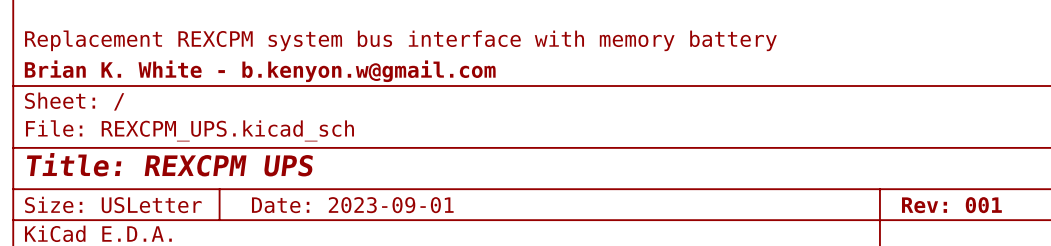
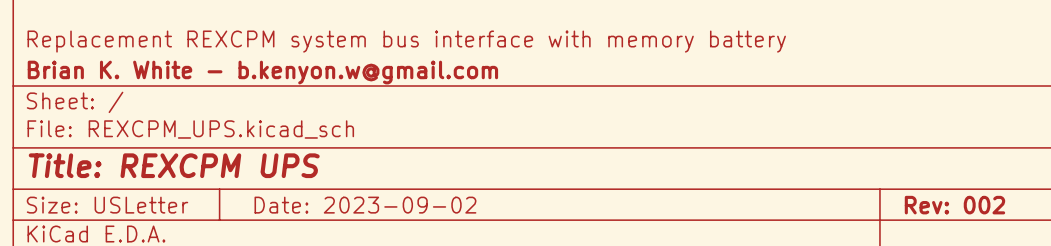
title block: Date: 2023-09-01 (352, 205) -> Date: 2023-09-02 (365, 205)
title block: Rev: 001 (951, 205) -> Rev: 002 (954, 205)

